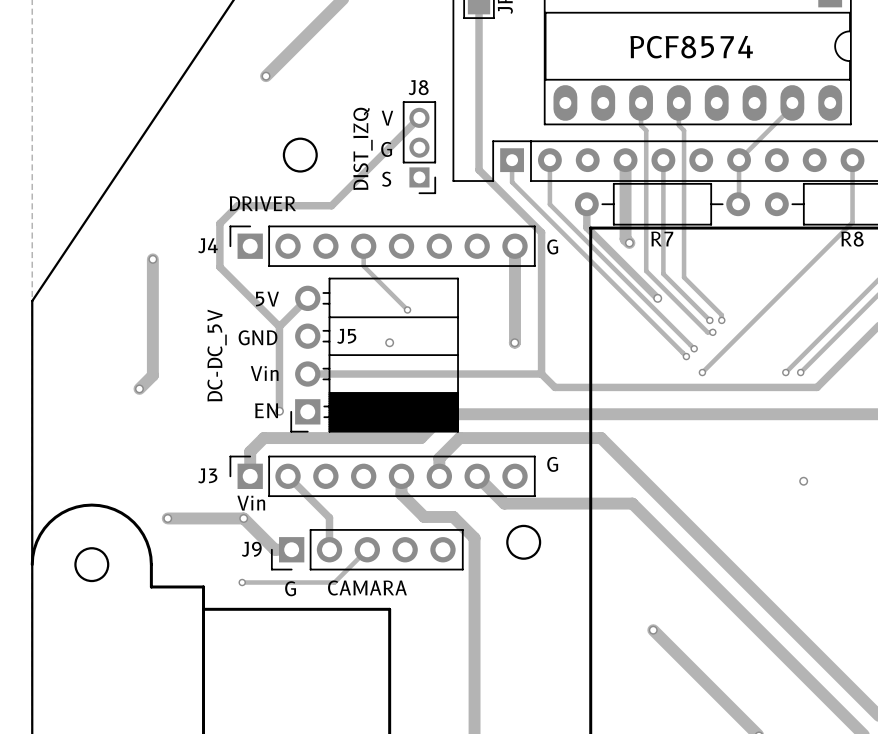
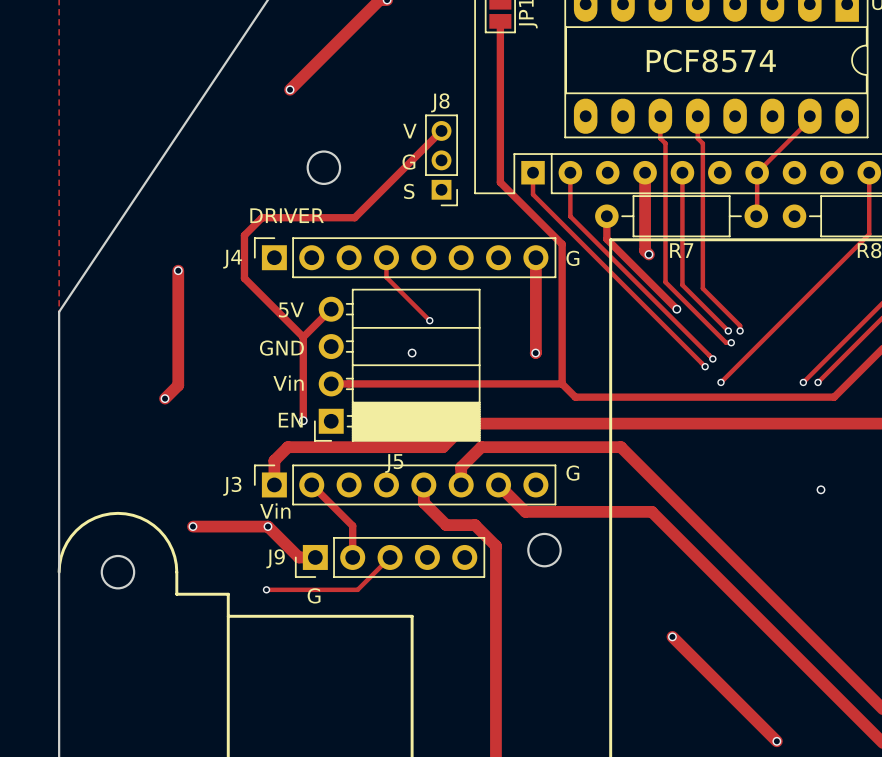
text: DIST_IZQ (363, 148) -> none
J5 name position: J5 (346, 336) -> J5 (394, 463)
text: DC-DC_5V (217, 355) -> none
text: CAMARA (367, 588) -> none

